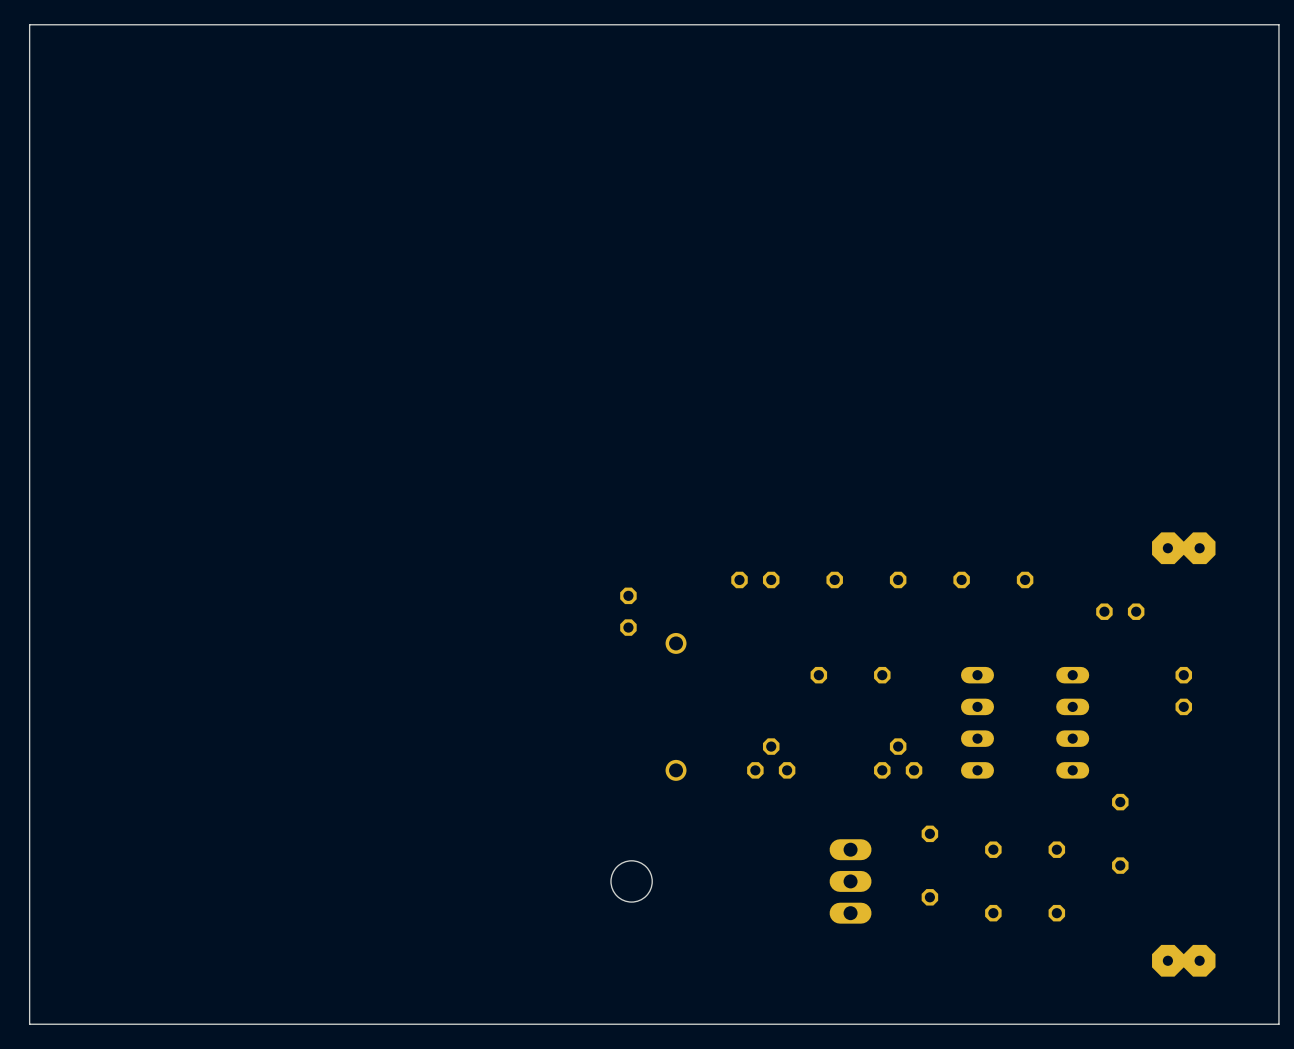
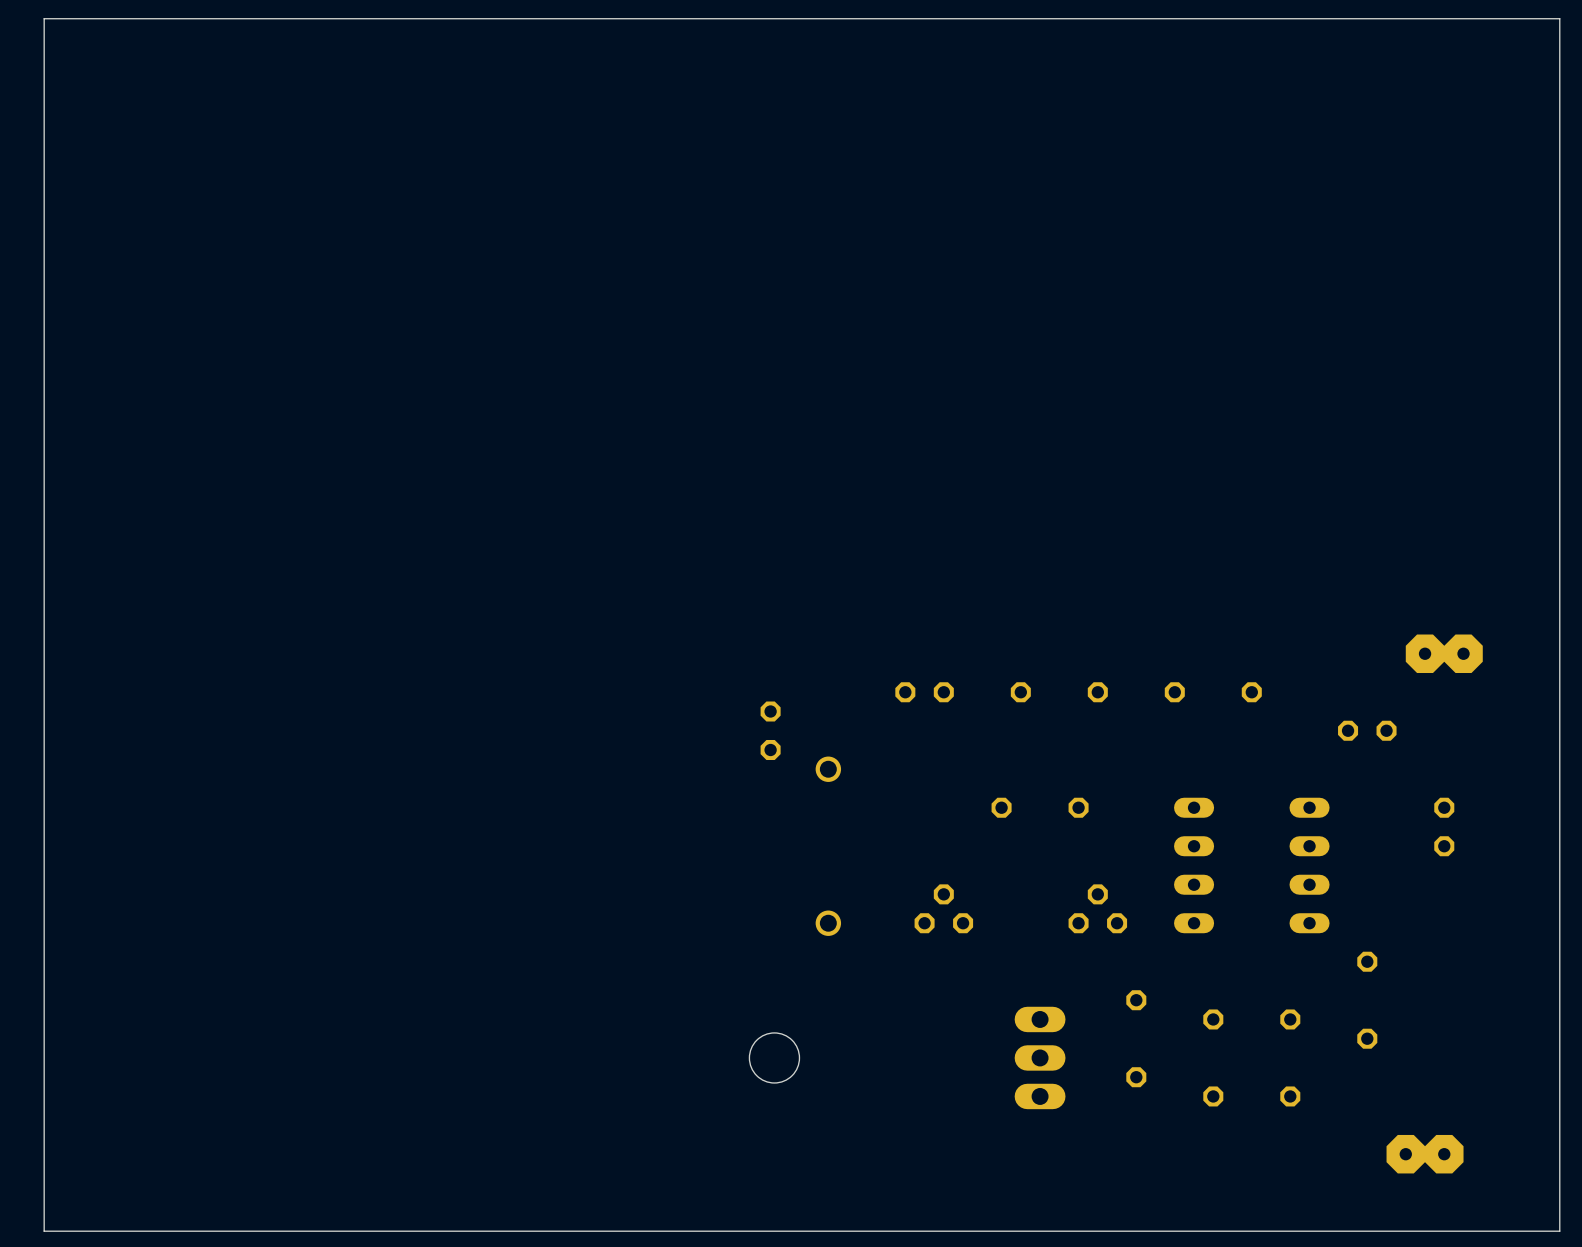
part: none -> (1405, 1154)
part: (1167, 960) -> none
part: none -> (1444, 1154)
part: (1199, 960) -> none

